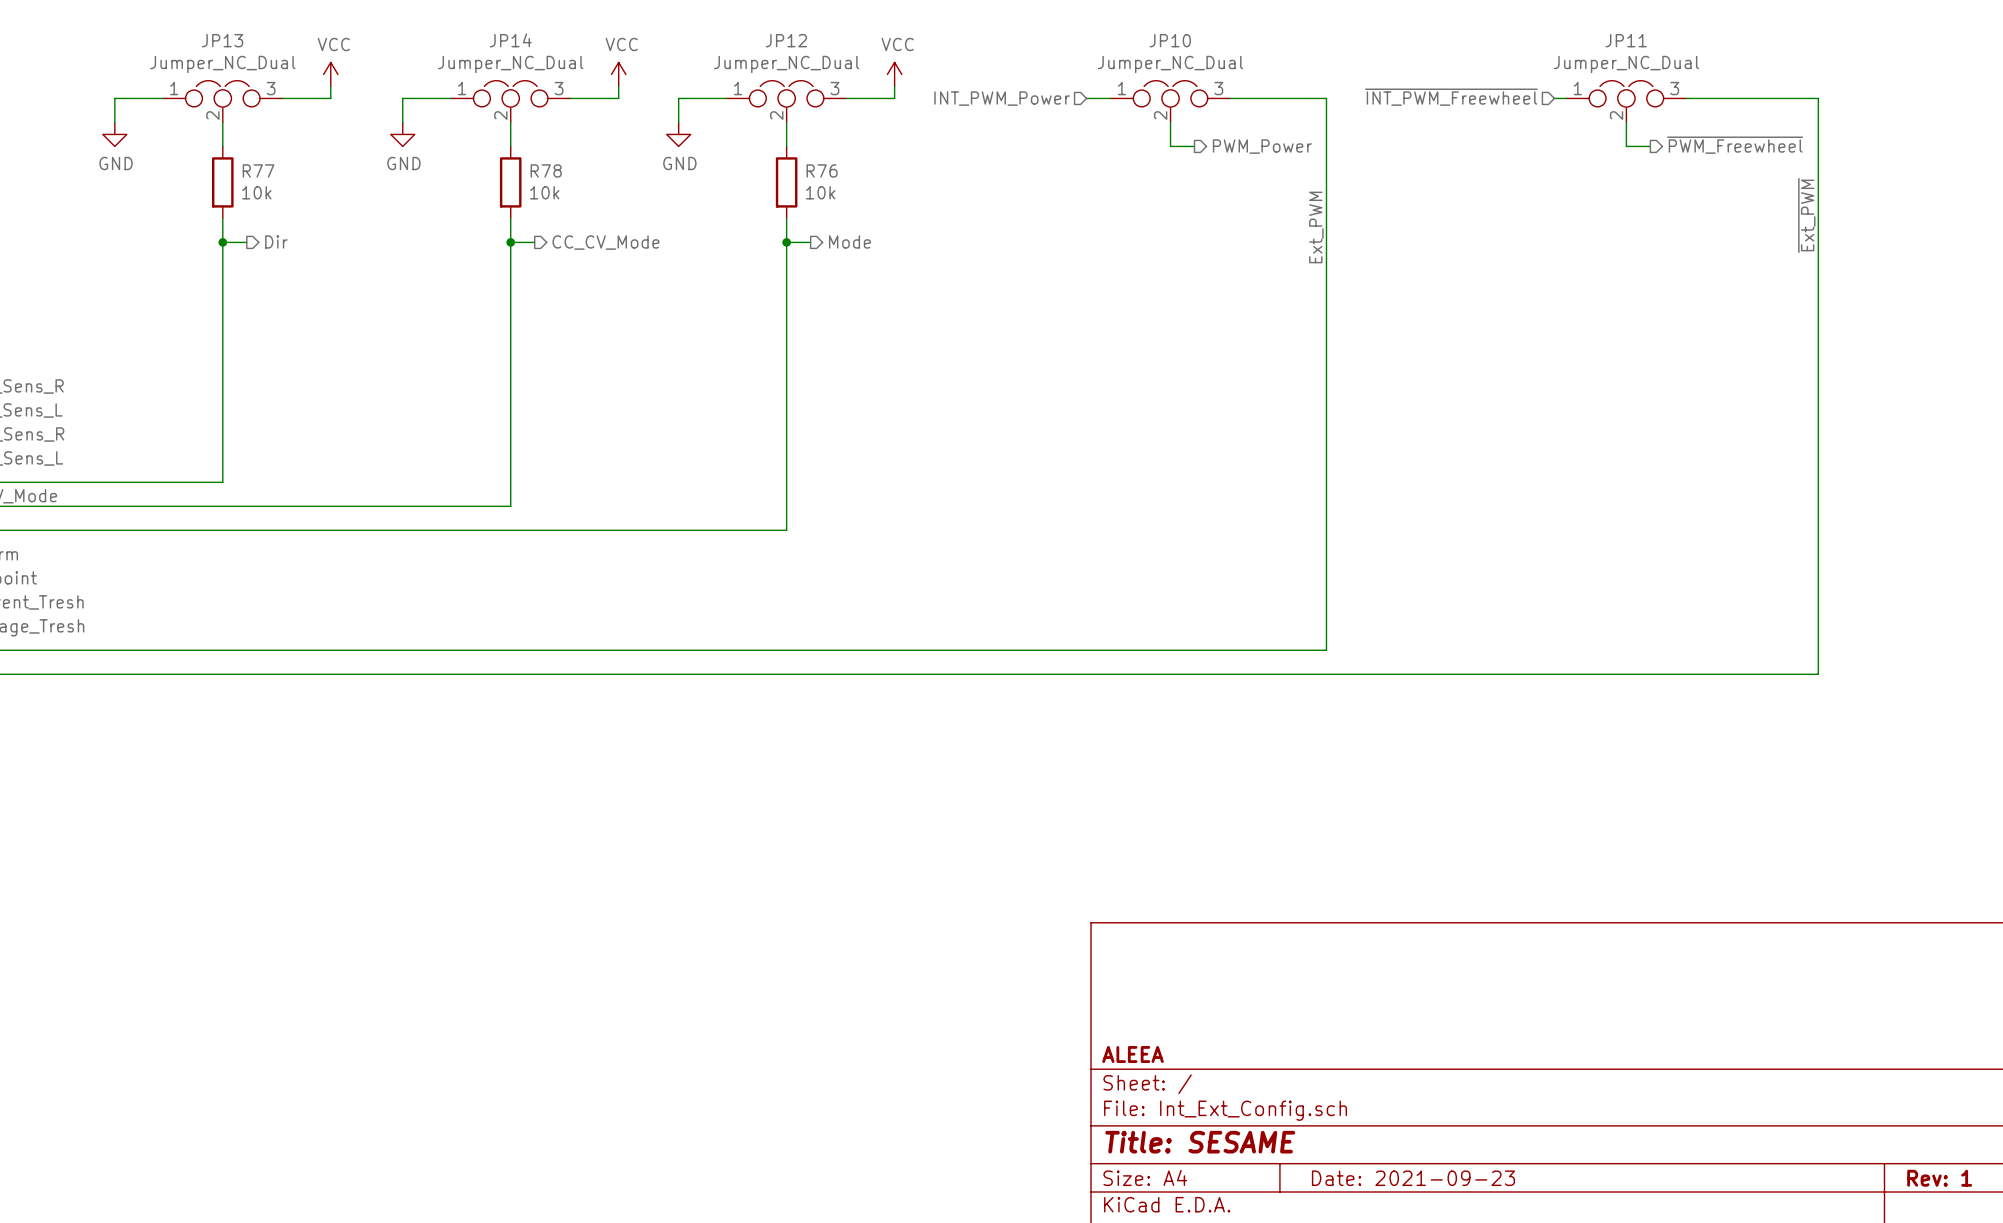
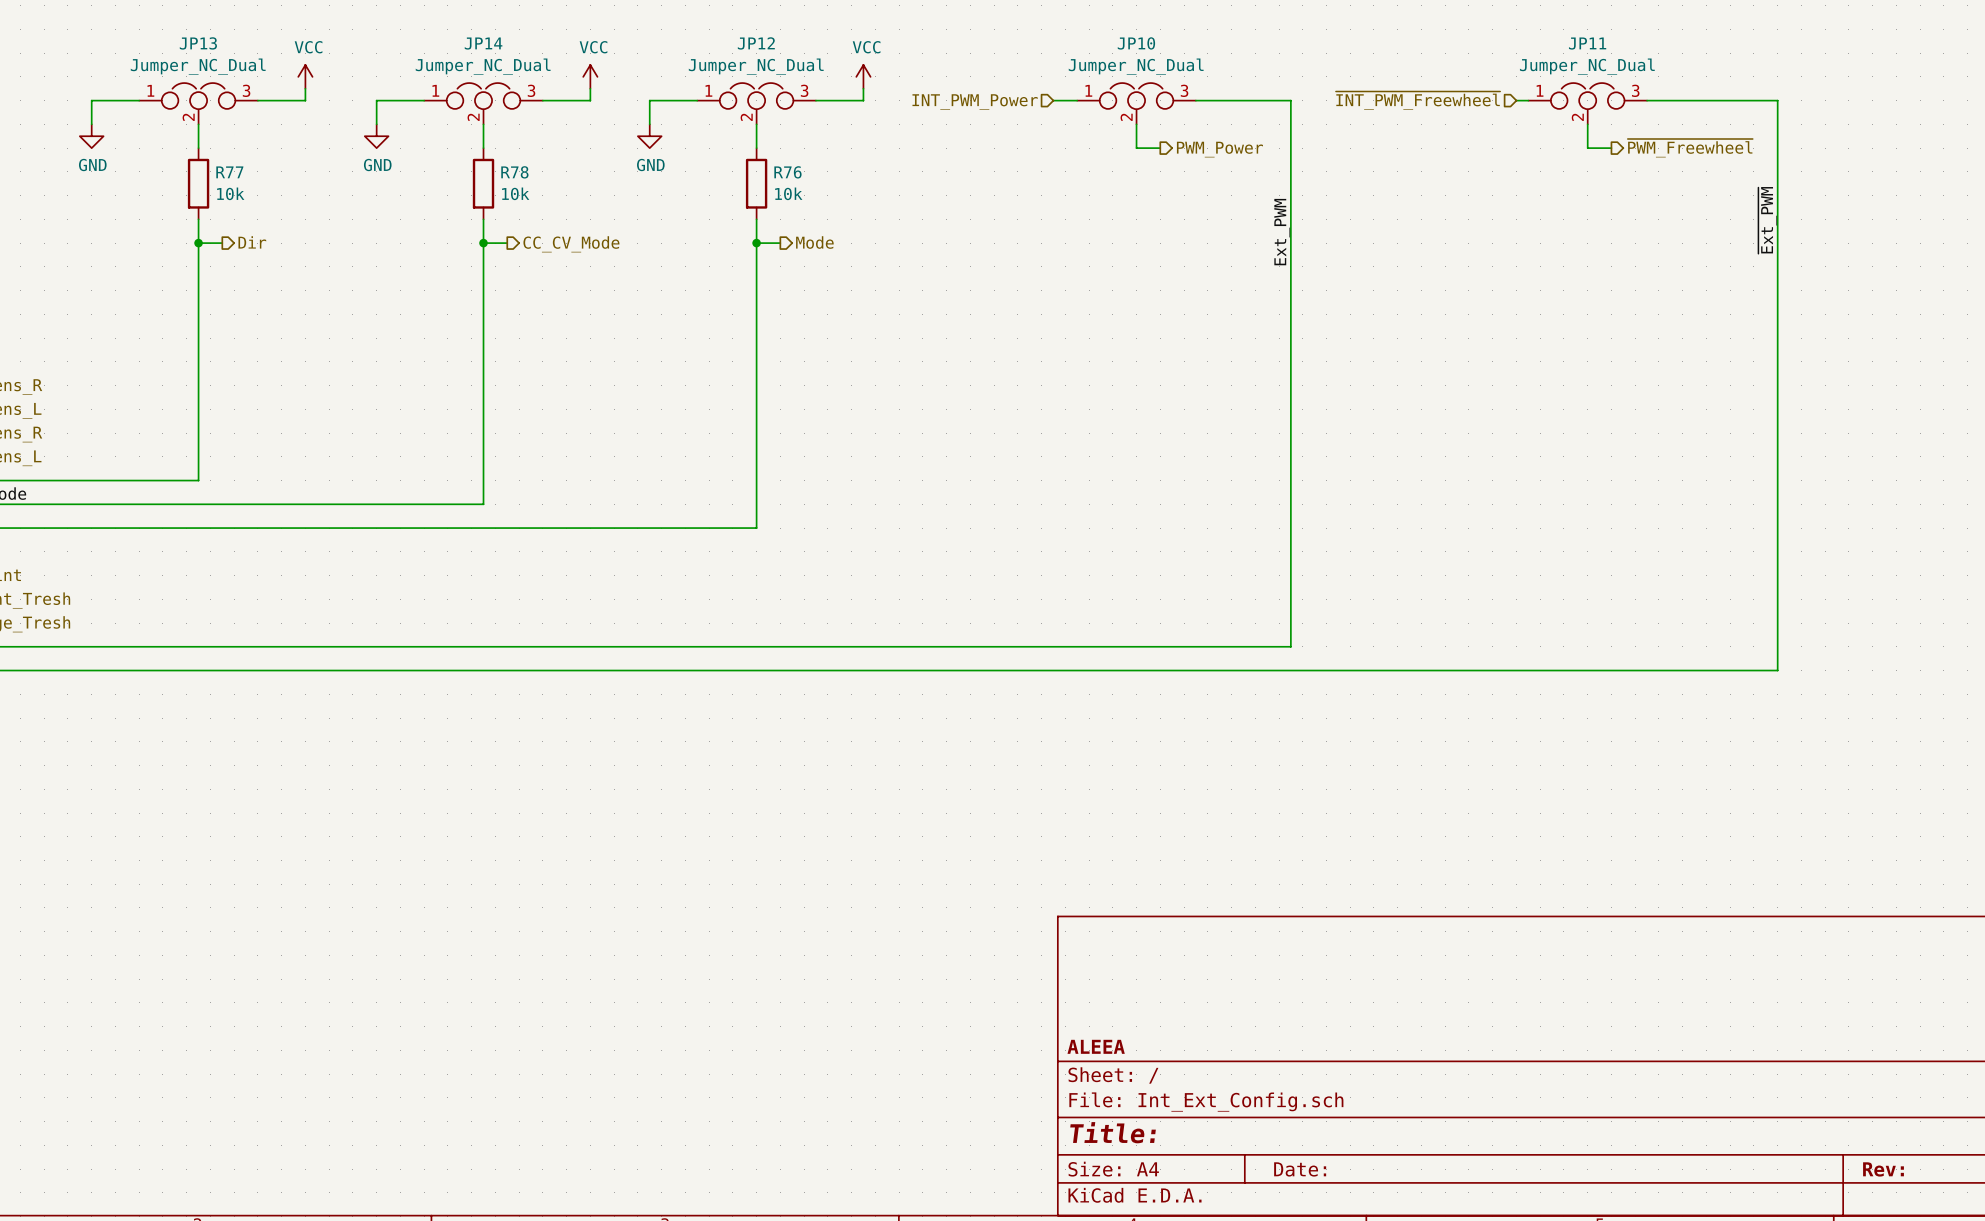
title block: Title: SESAME (1200, 1142) -> Title: (1113, 1132)
title block: Date: 2021-09-23 (1413, 1178) -> Date: (1300, 1169)
title block: Rev: 1 (1939, 1178) -> Rev: (1883, 1169)

